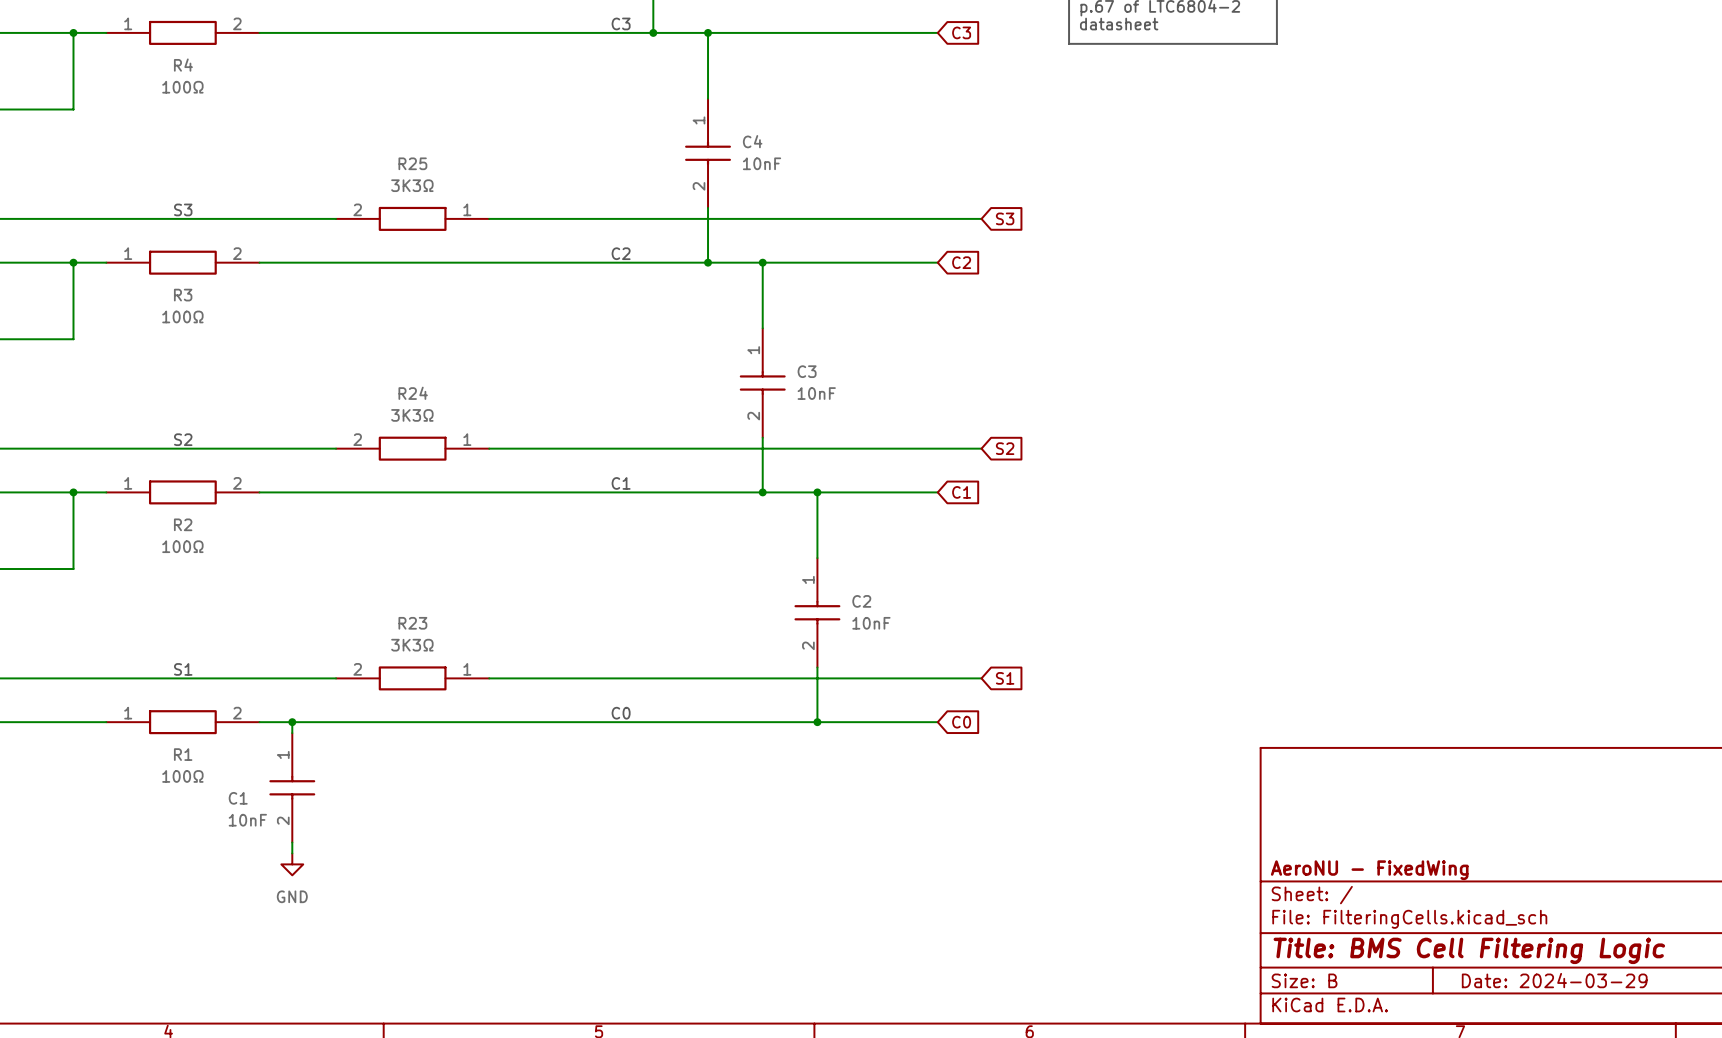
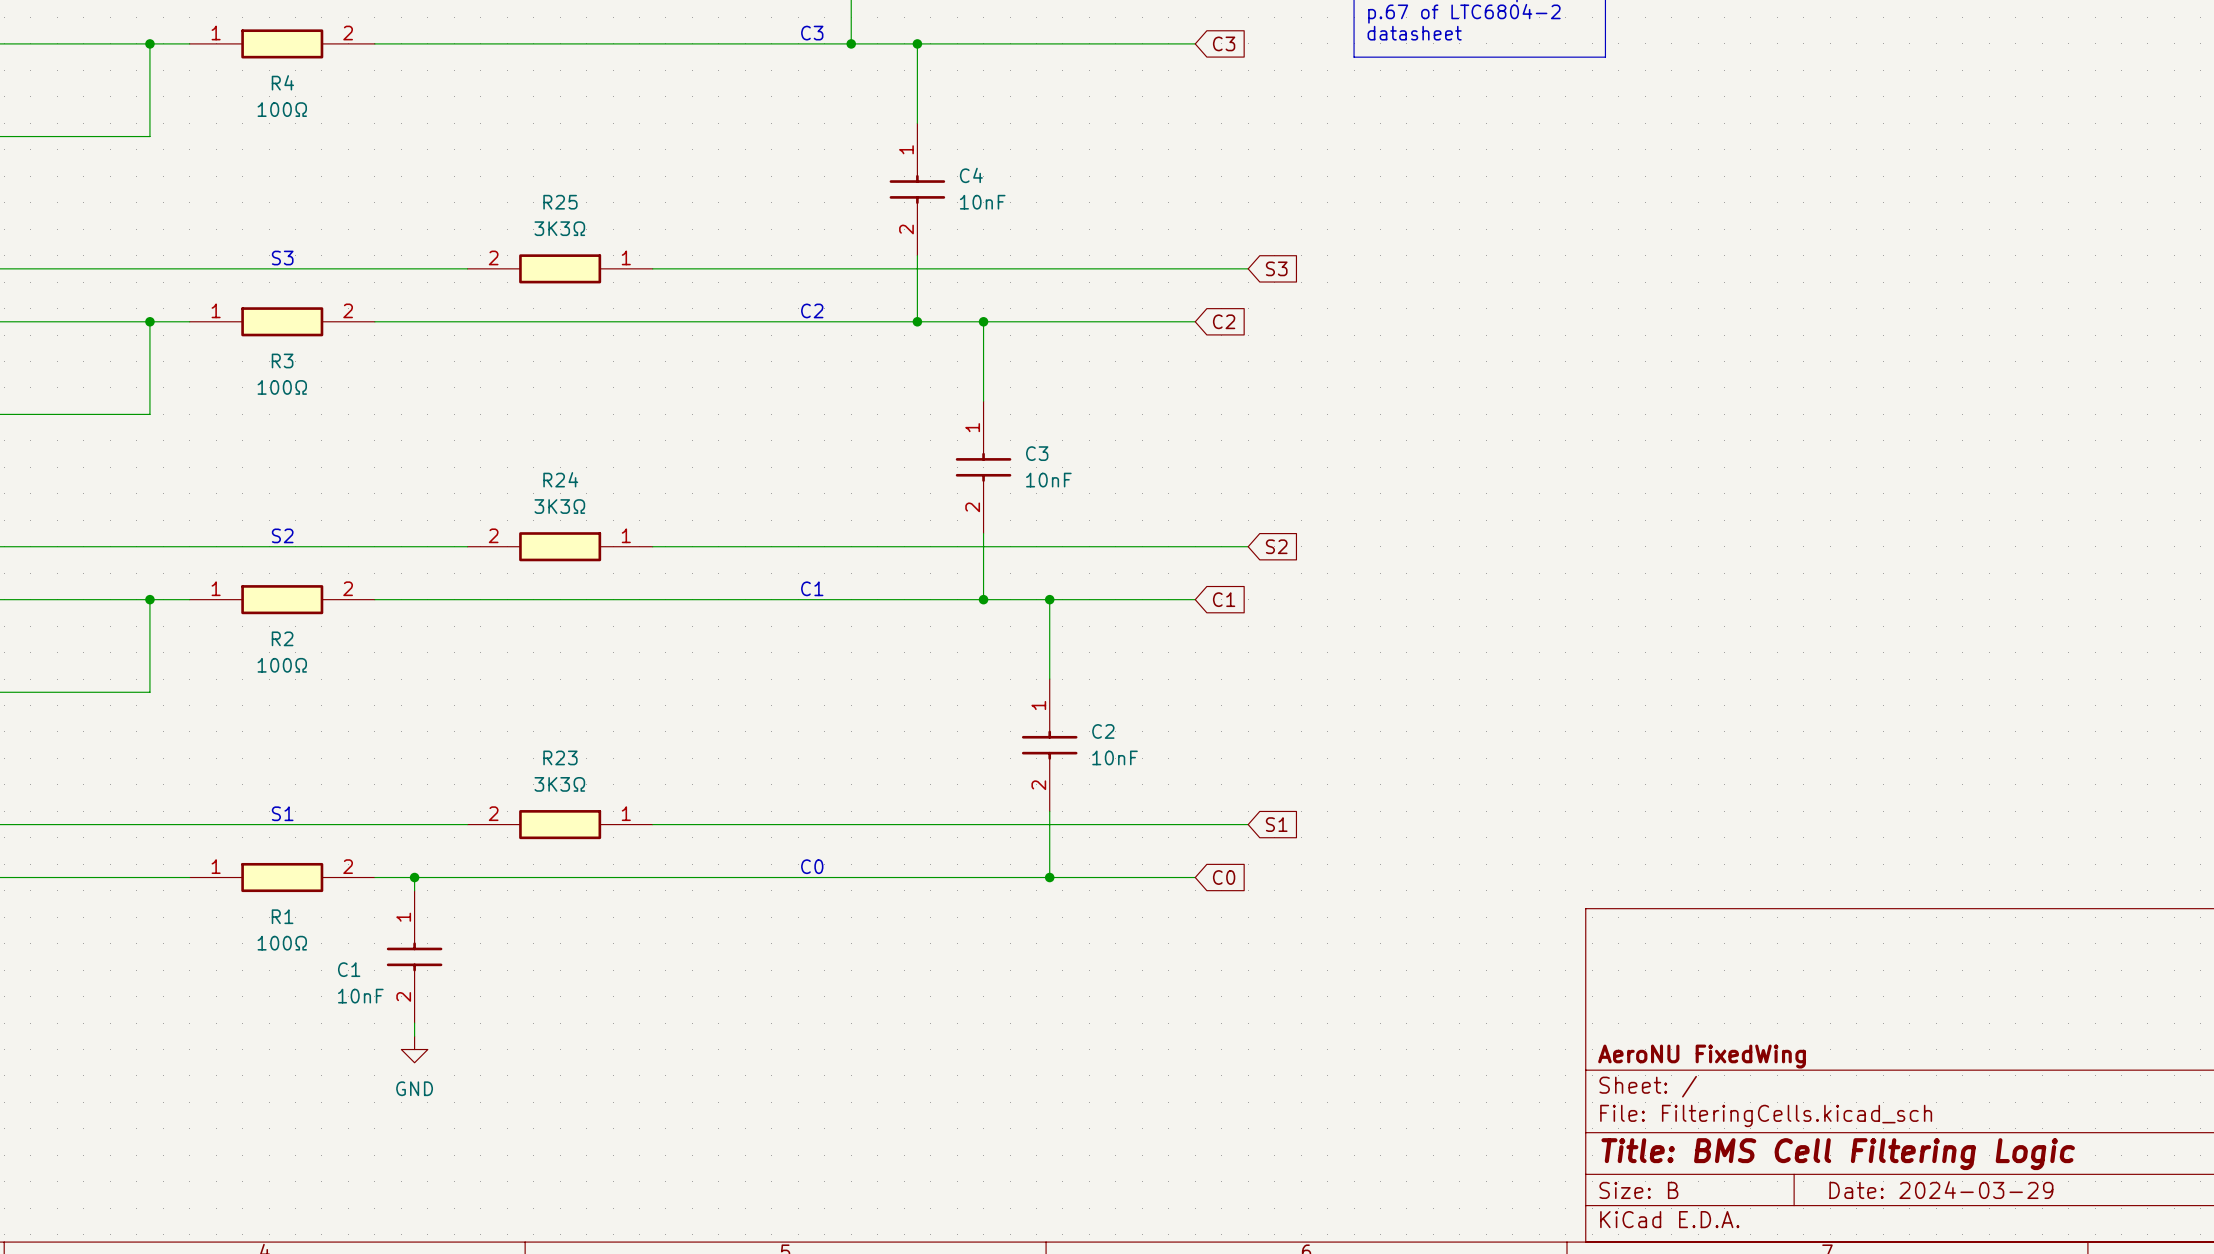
title block: AeroNU - FixedWing (1369, 870) -> AeroNU FixedWing (1702, 1056)

